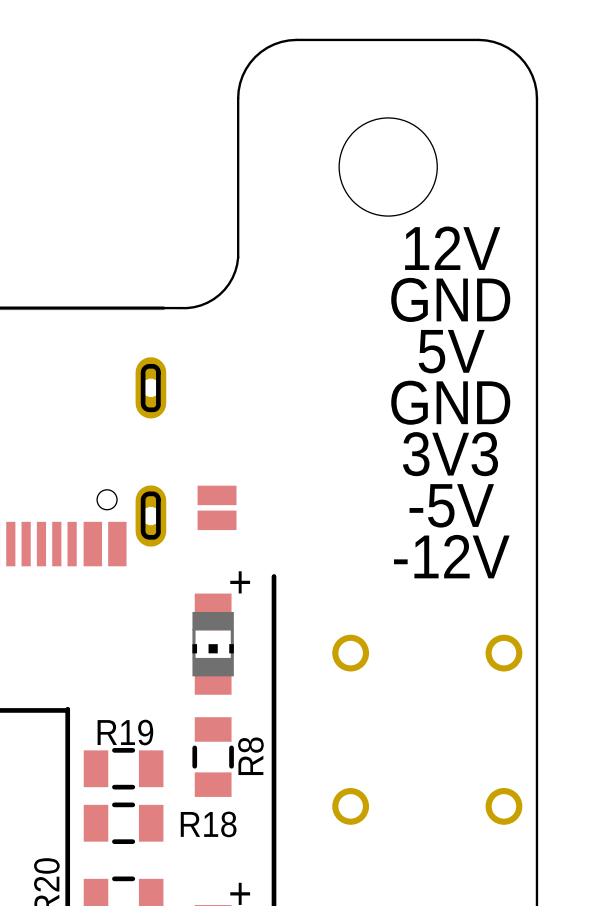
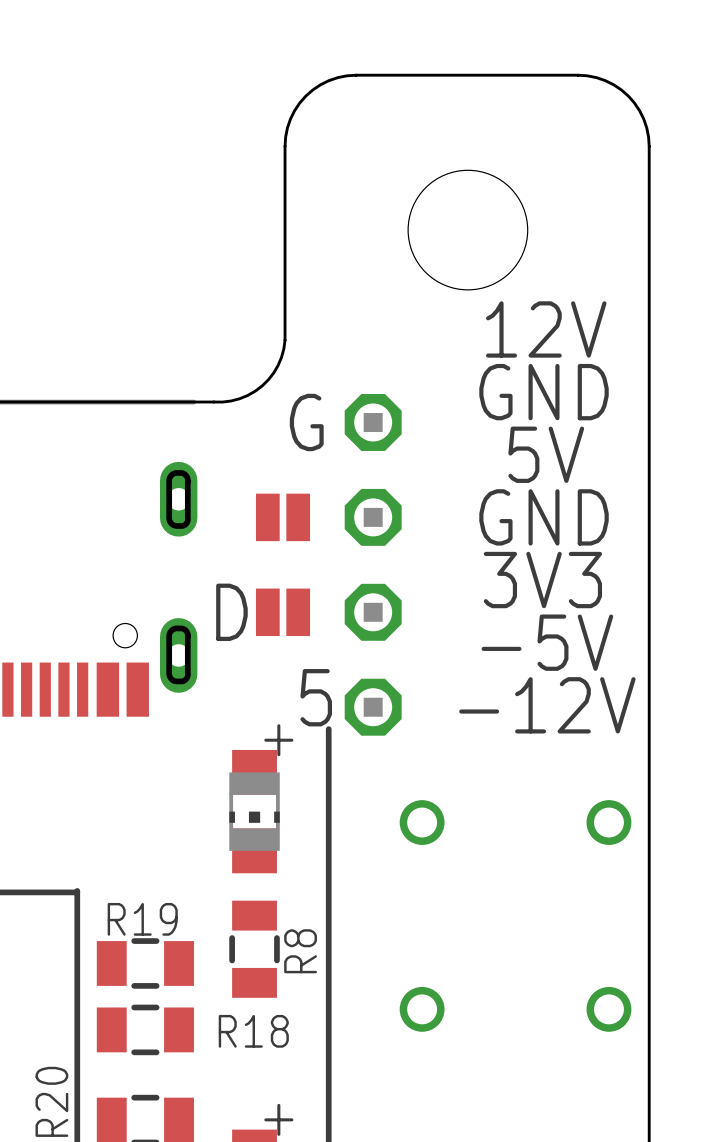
text: none -> G (306, 422)
part: none -> (283, 517)
part: none -> (373, 564)
text: none -> D (231, 612)
part rotation: 0° (217, 507) -> 90° clockwise (283, 612)
part position: (217, 507) -> (283, 612)
text: none -> 5 (316, 697)

